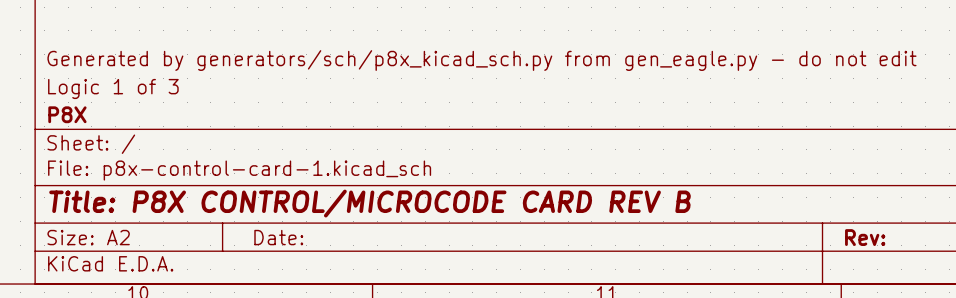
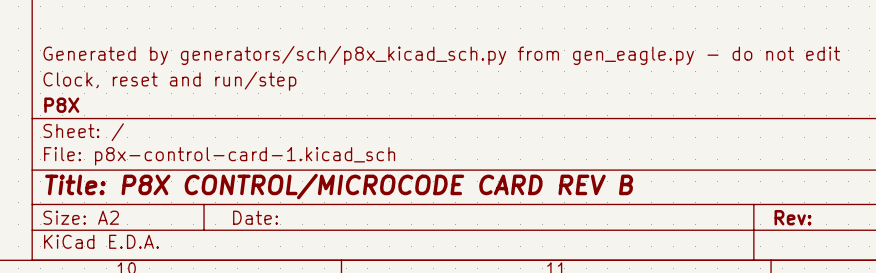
title block: Logic 1 of 3 (113, 88) -> Clock, reset and run/step (169, 81)

